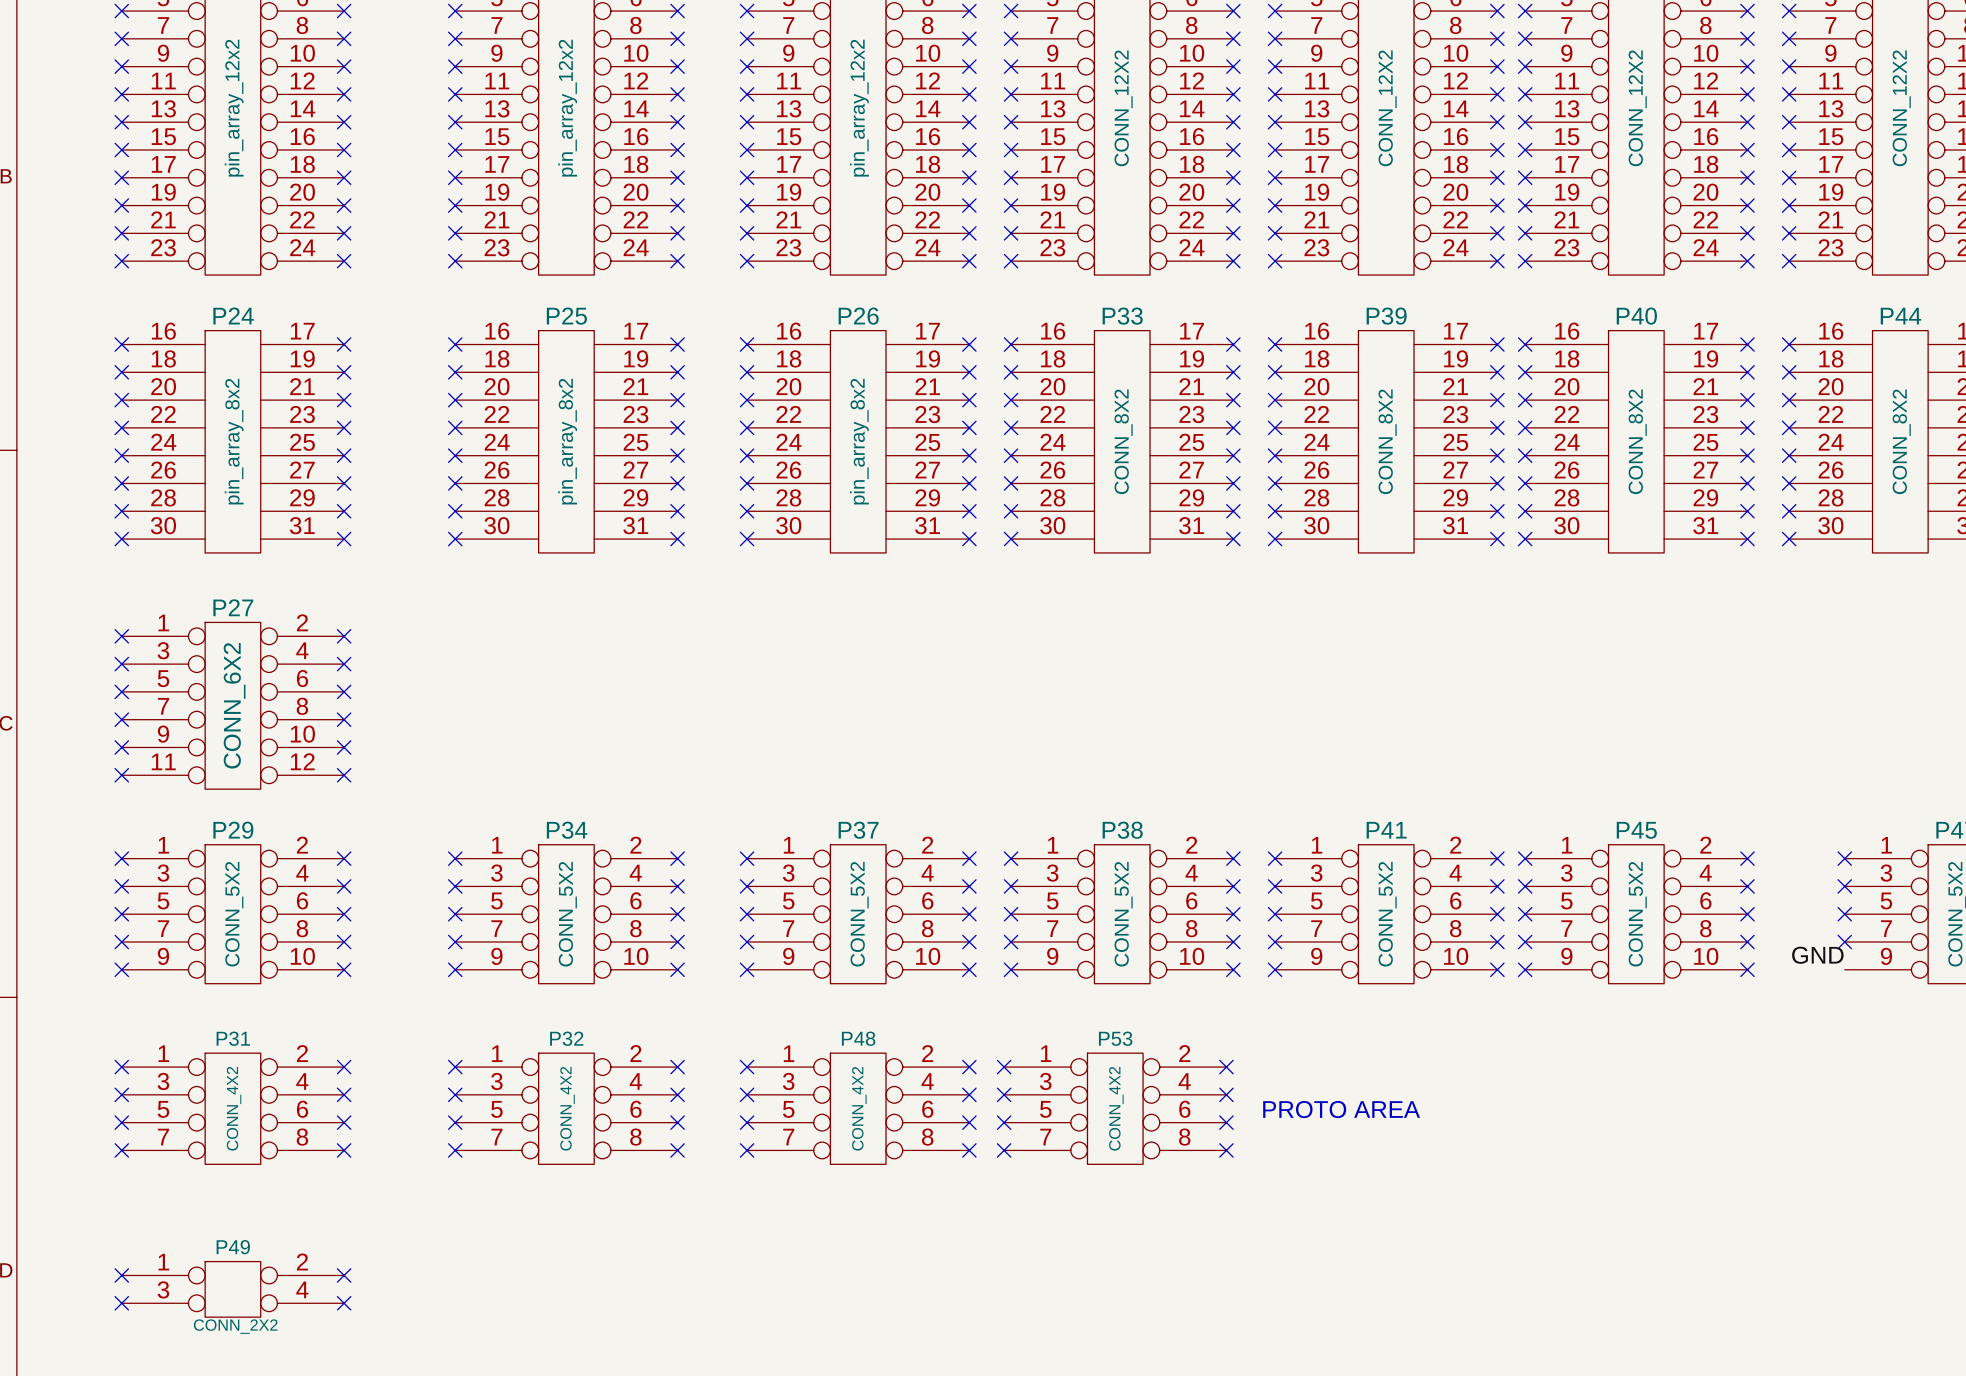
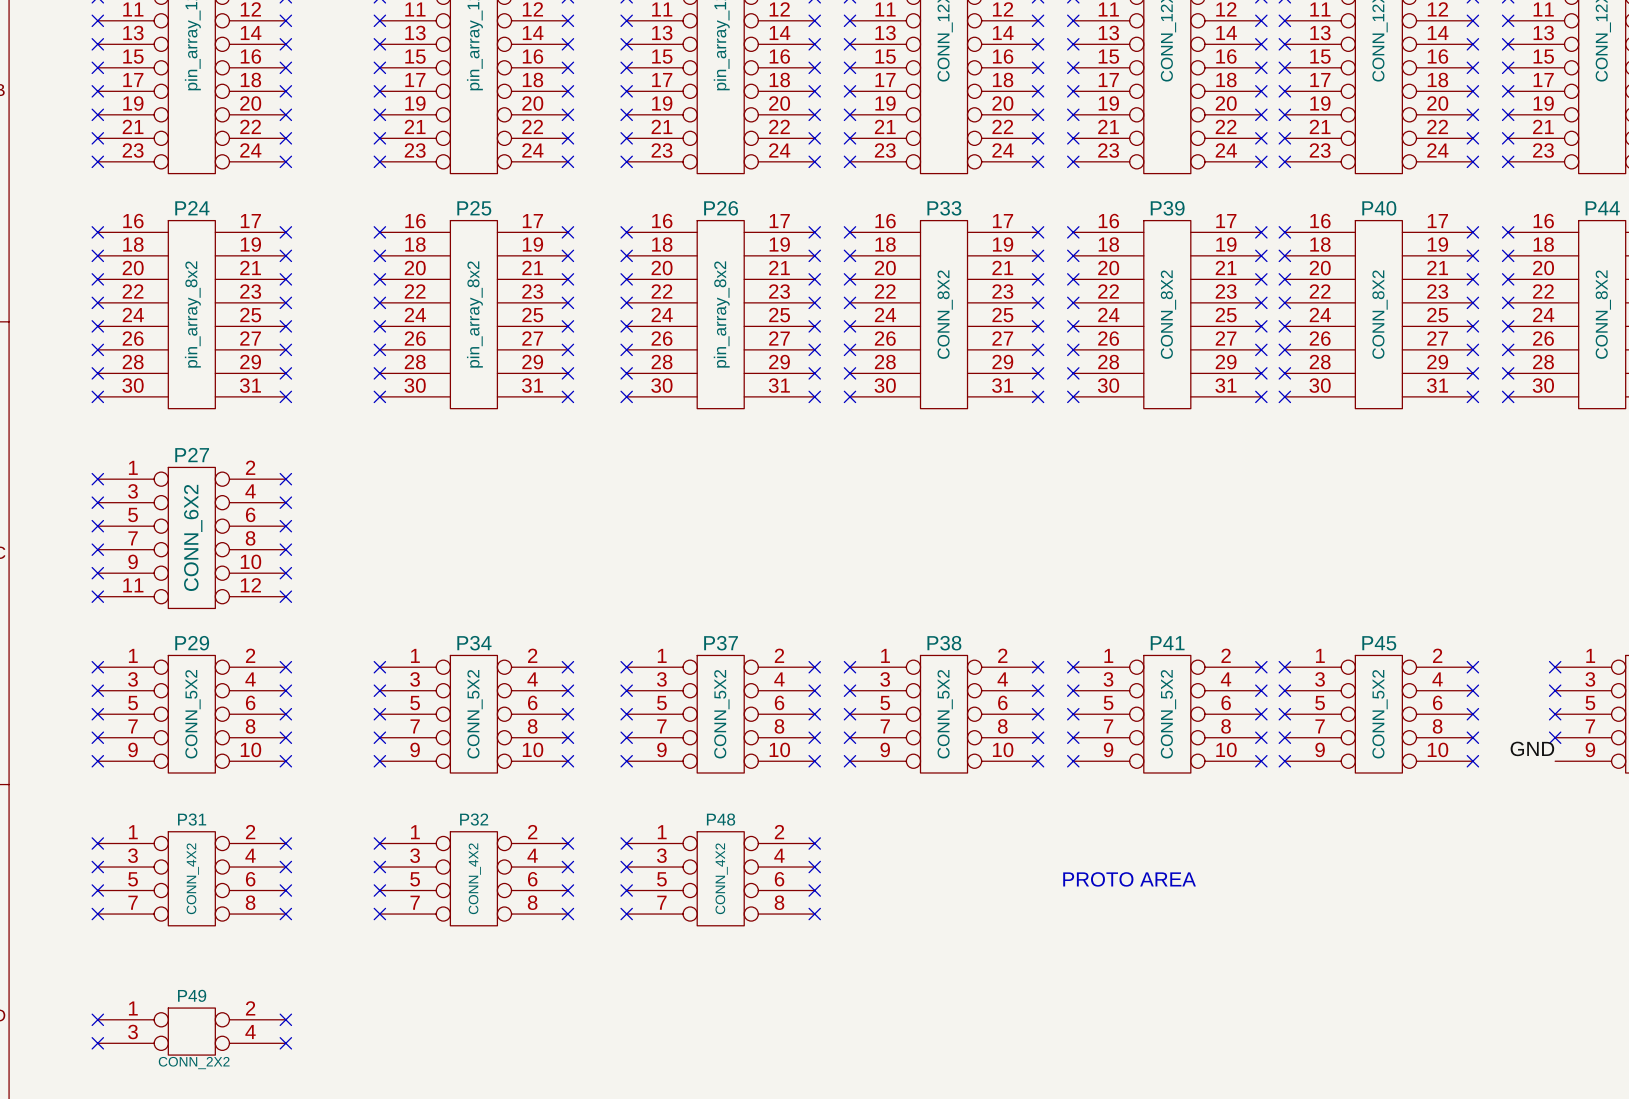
no-connect mark: (1004, 1067) -> none
no-connect mark: (1226, 1067) -> none
no-connect mark: (1004, 1094) -> none
no-connect mark: (1226, 1094) -> none
P53: CONN_4X2 (1115, 1108) -> none
no-connect mark: (1004, 1122) -> none
no-connect mark: (1226, 1122) -> none
no-connect mark: (1004, 1150) -> none
no-connect mark: (1226, 1150) -> none

